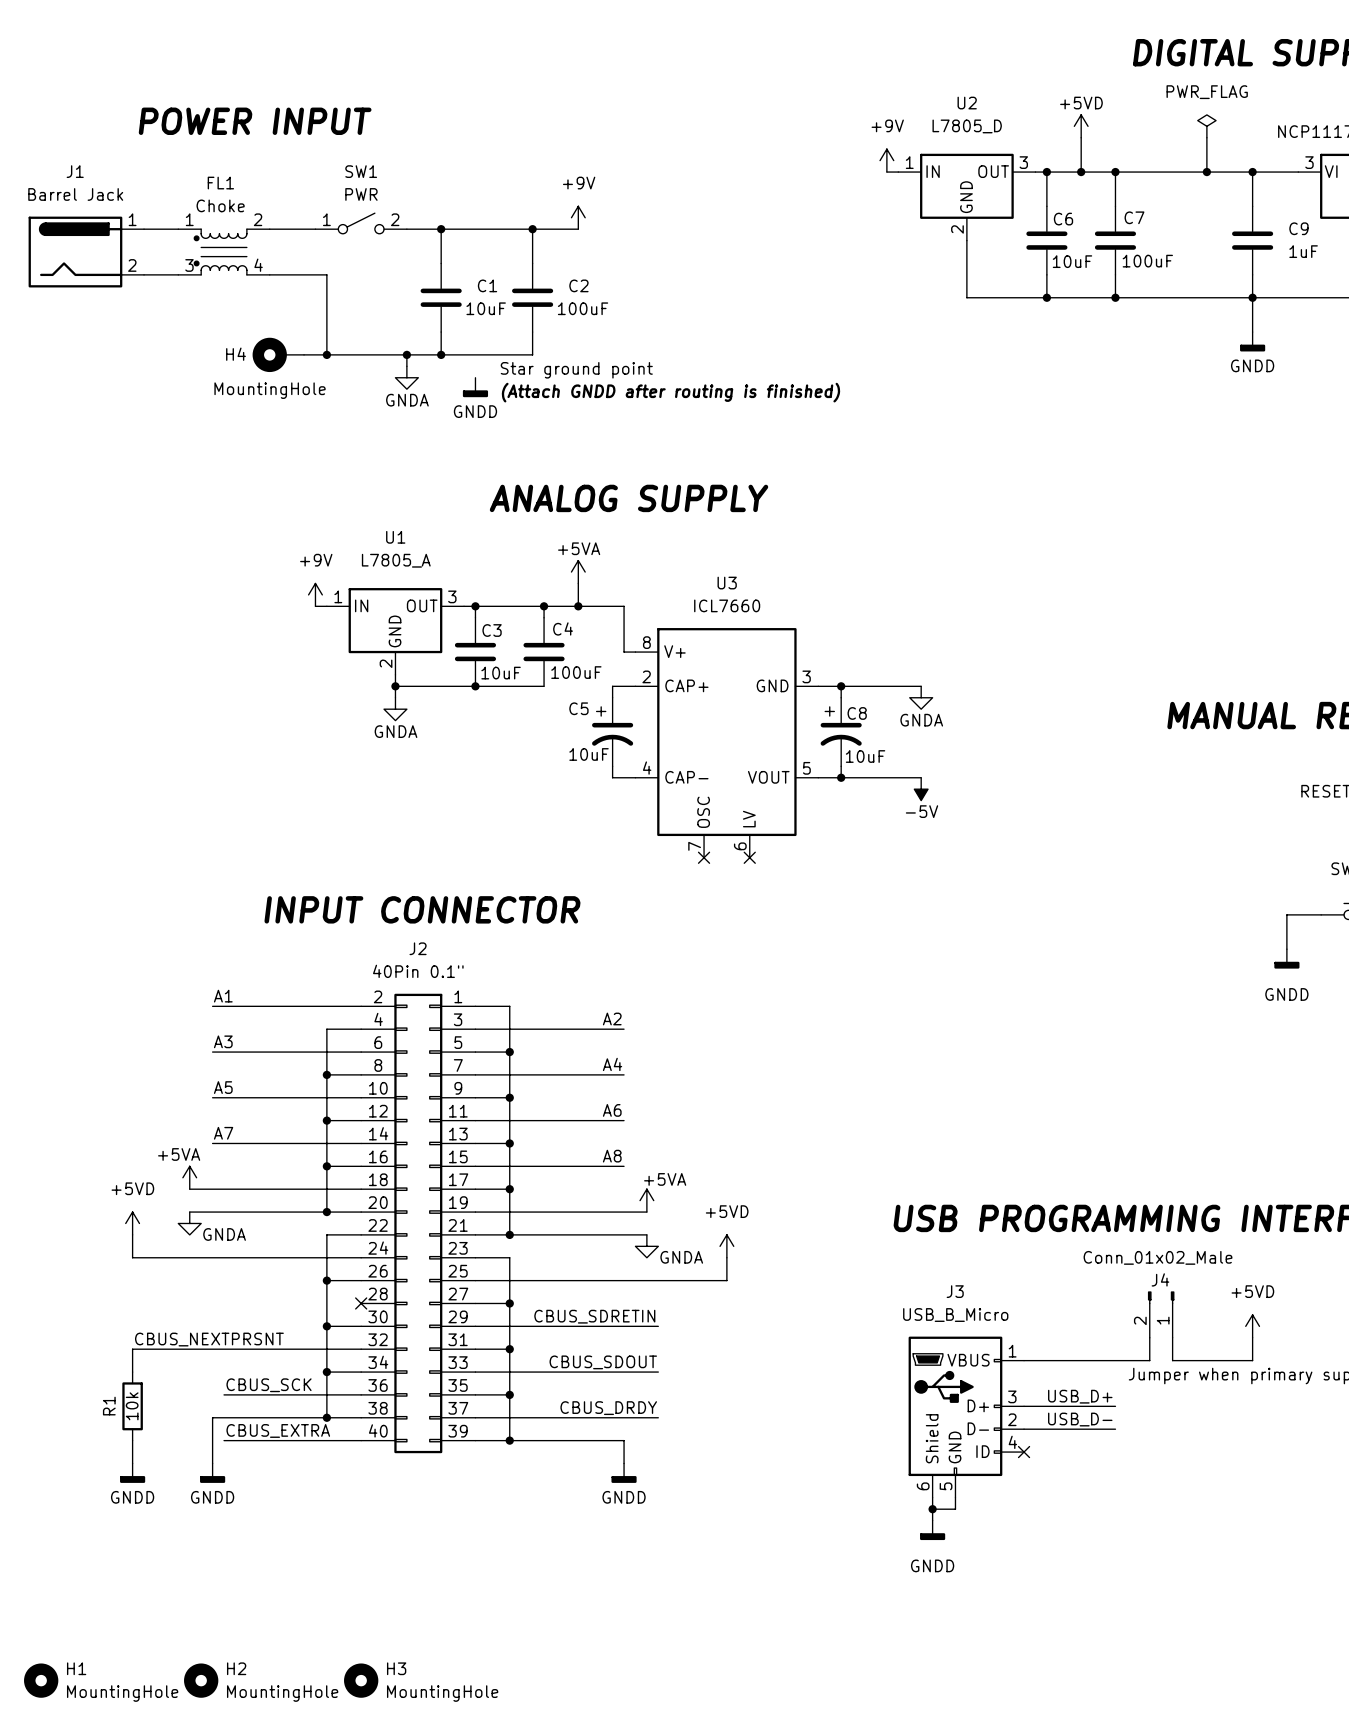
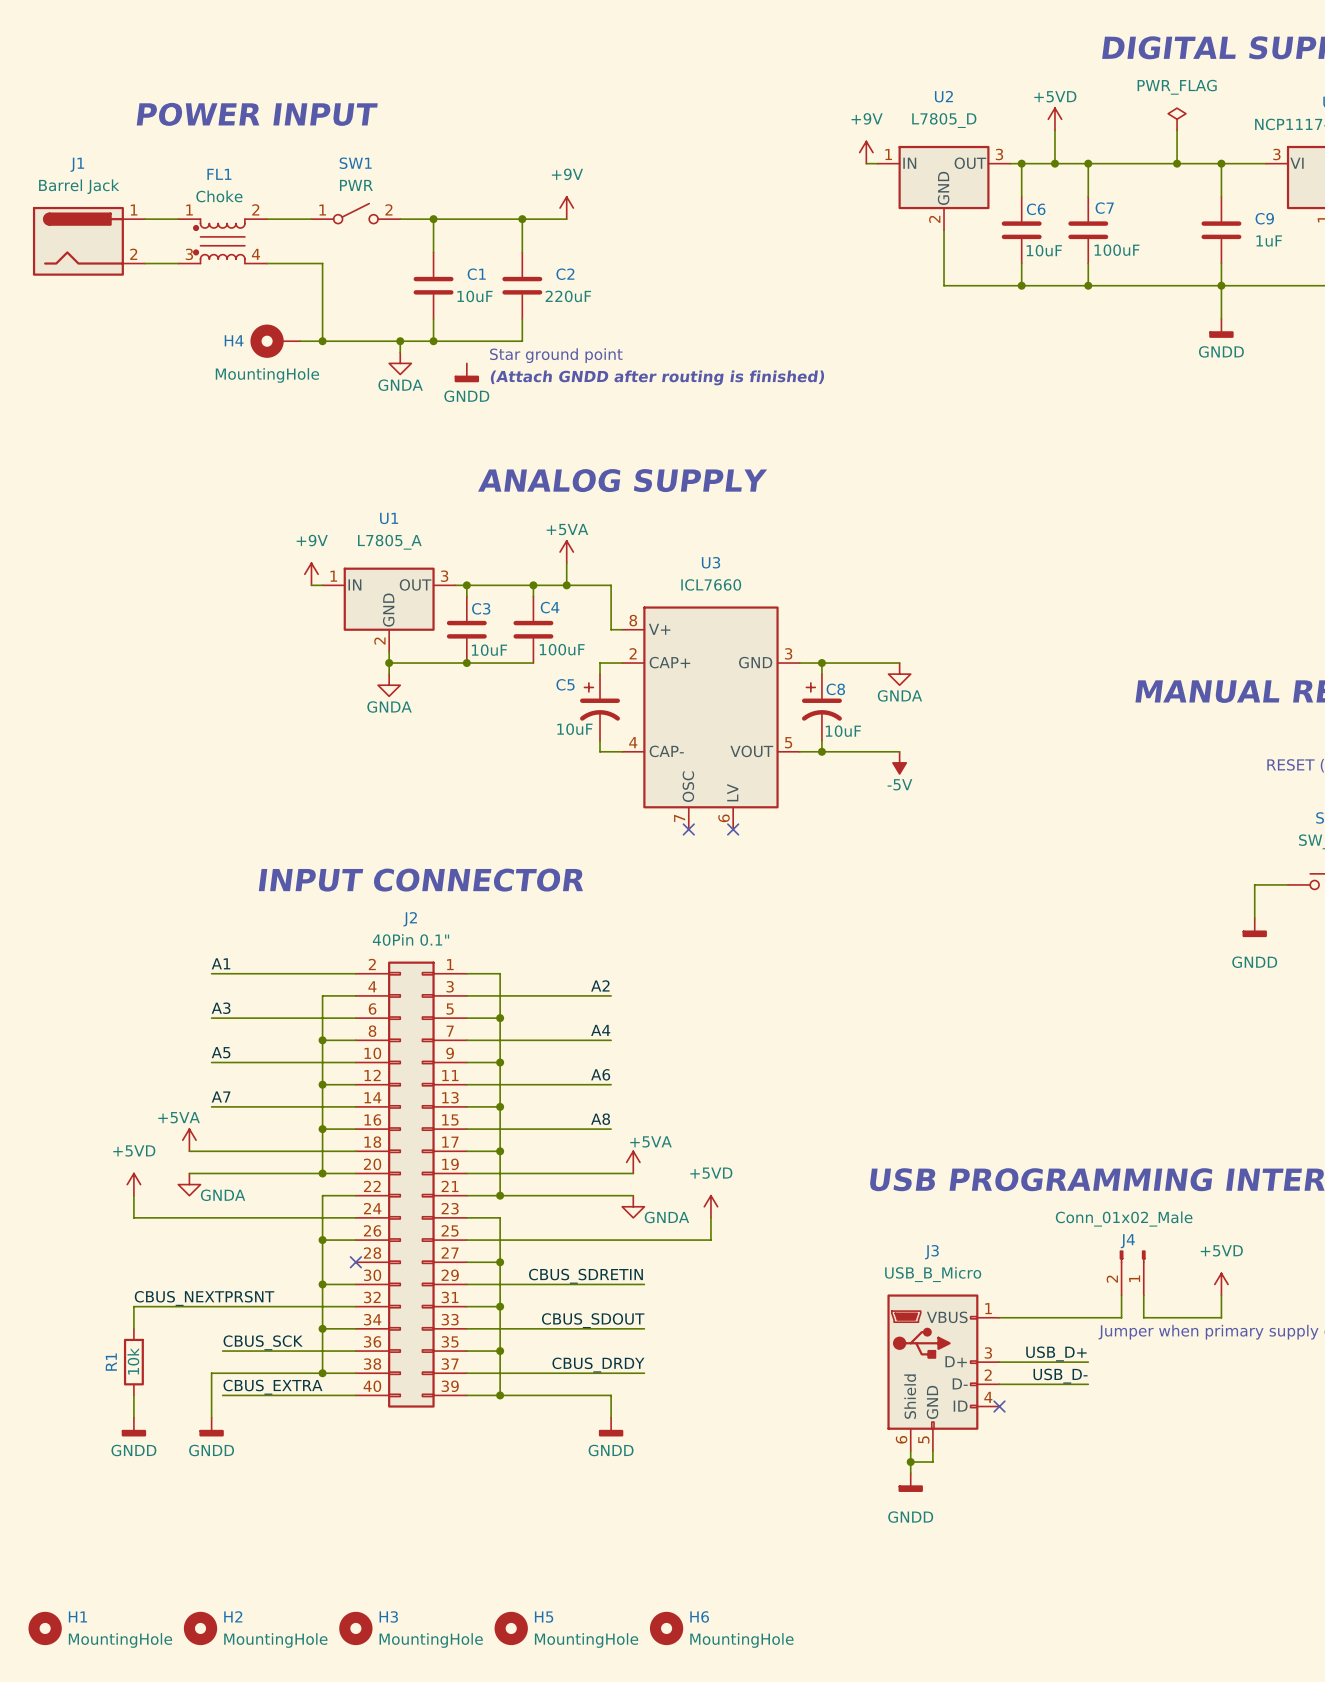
C2 value: 100uF (583, 308) -> 220uF (568, 296)
H5: none -> MountingHole (511, 1628)
H6: none -> MountingHole (666, 1628)

